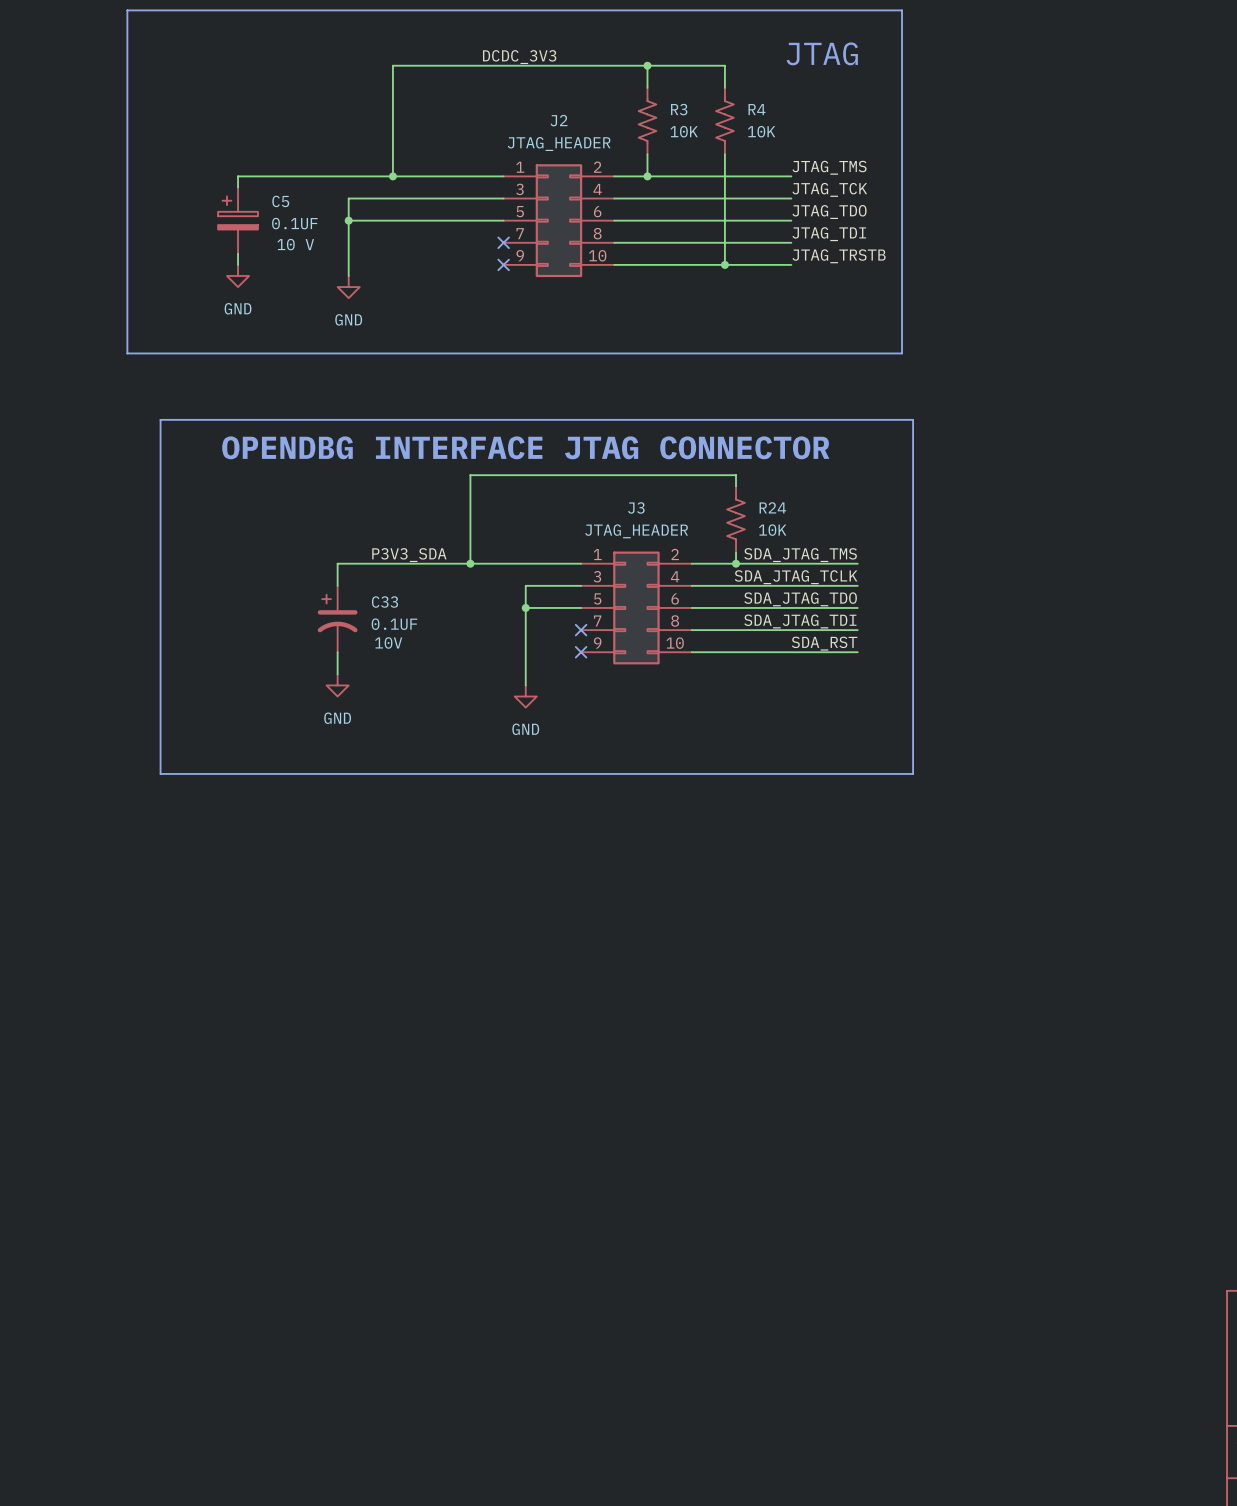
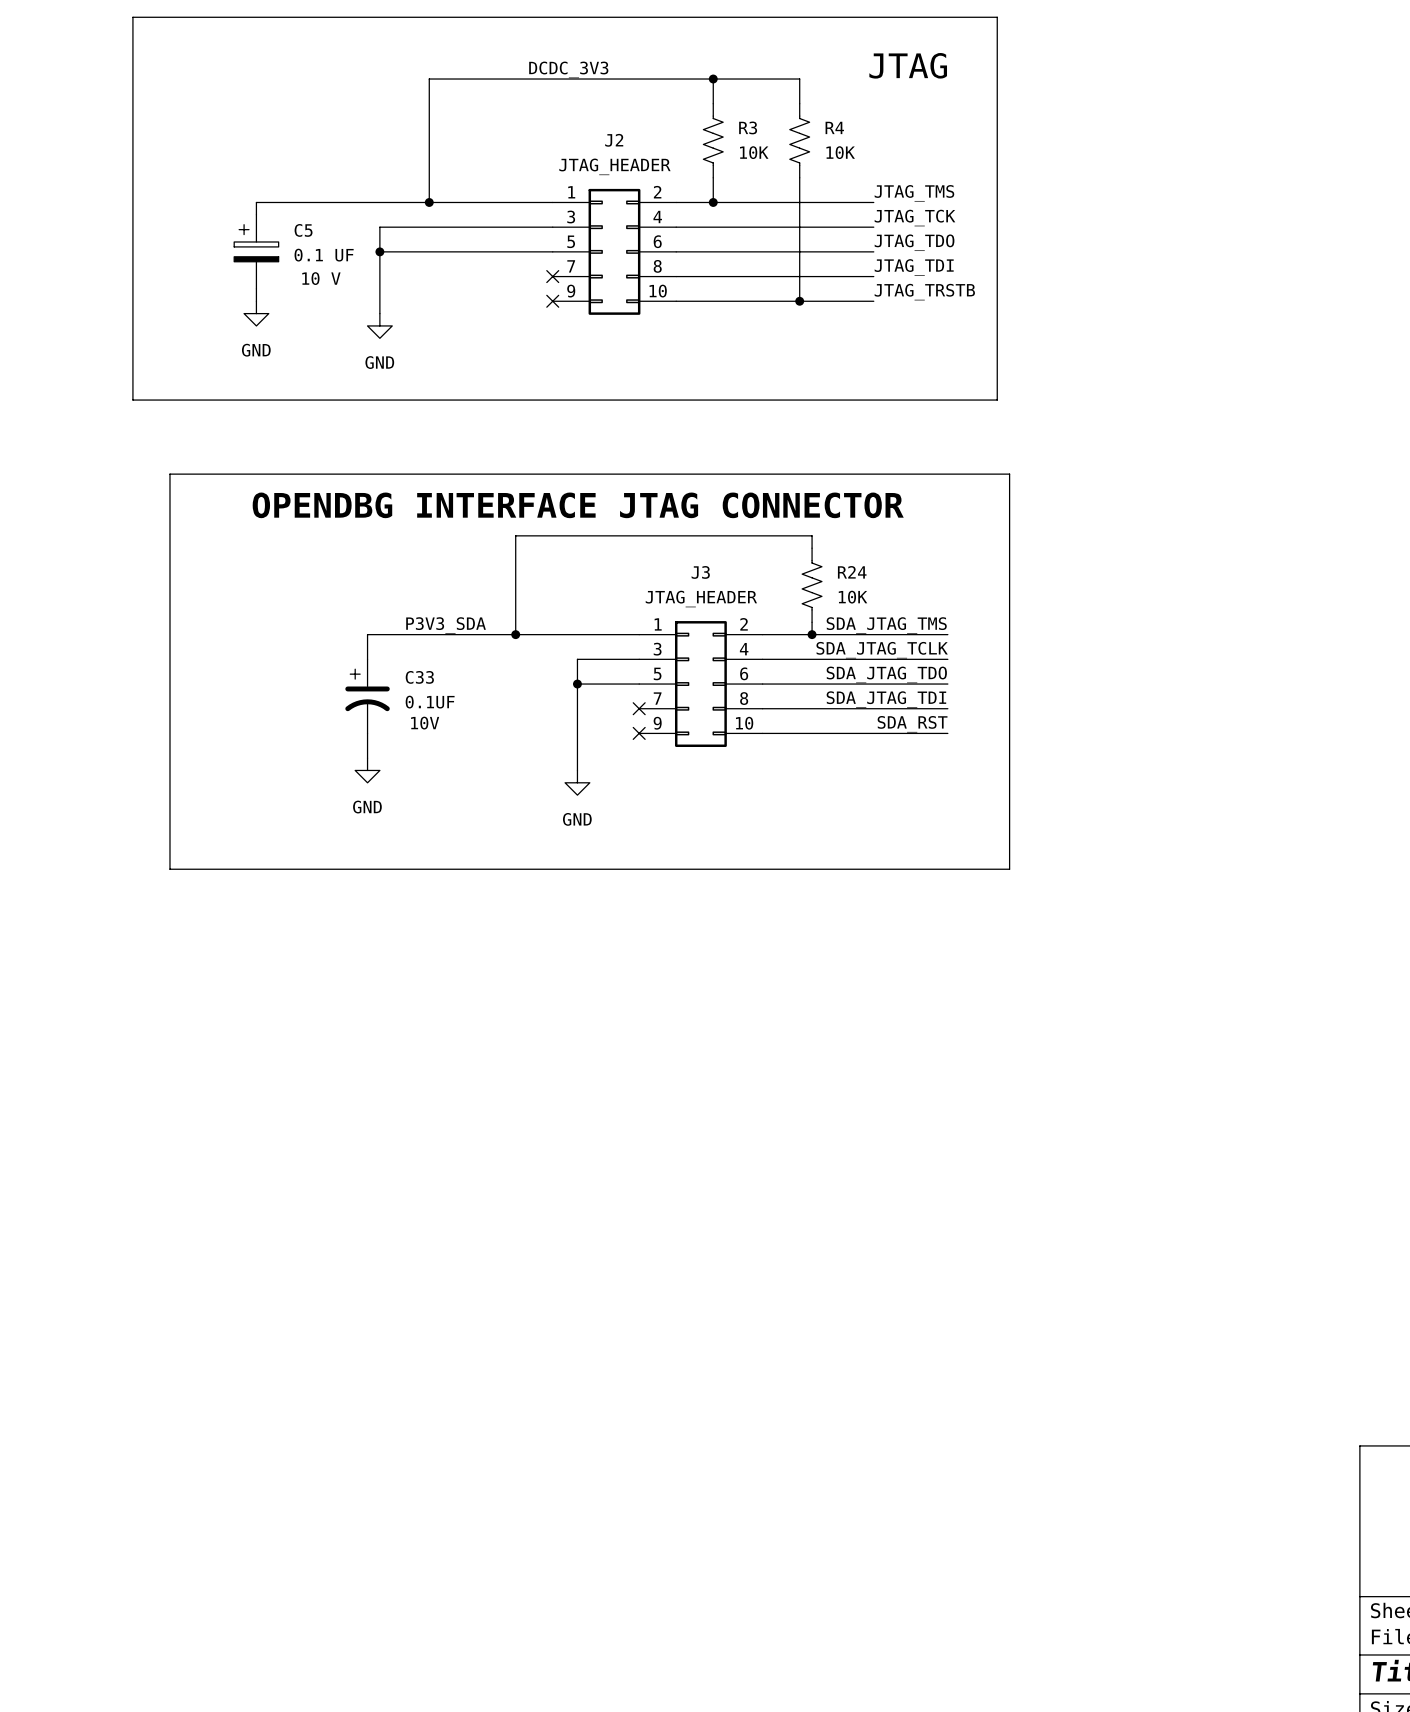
C5 value: 0.1UF (294, 223) -> 0.1 UF (324, 255)

